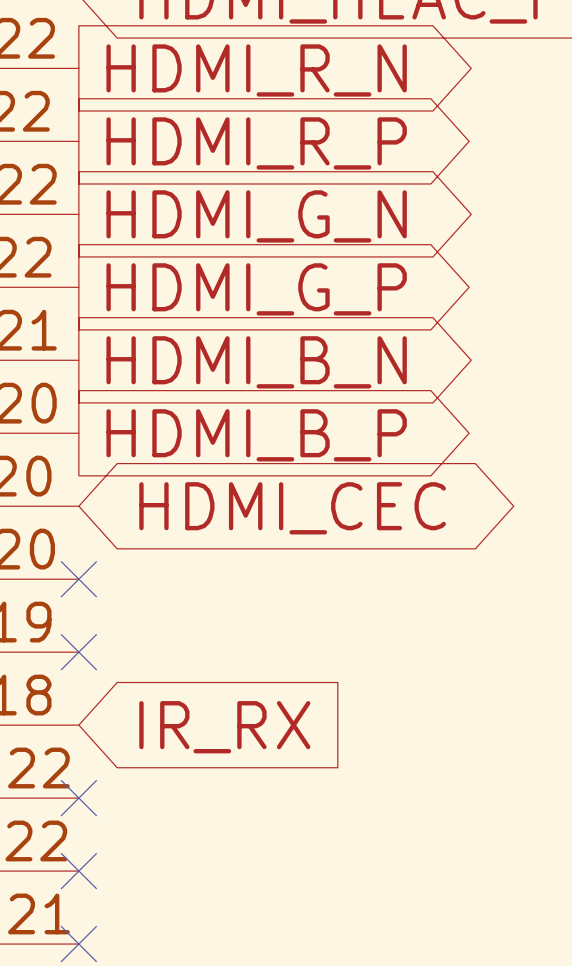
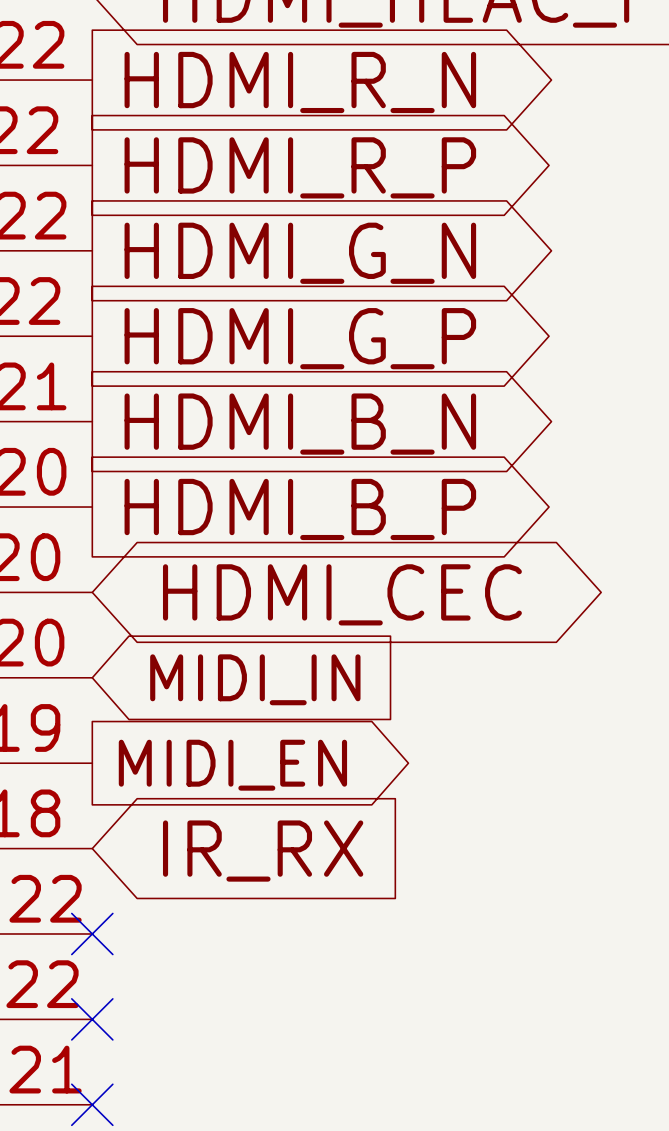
no-connect mark: (78, 579) -> none
global label: none -> MIDI_IN (255, 679)
no-connect mark: (78, 652) -> none
global label: none -> MIDI_EN (232, 765)

